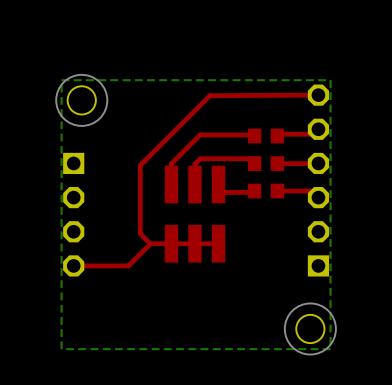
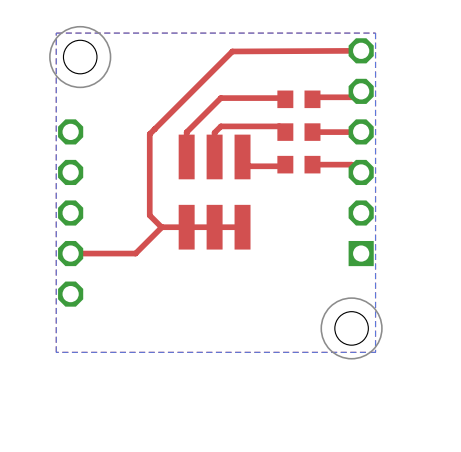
part: (73, 214) -> none
part: none -> (70, 213)

